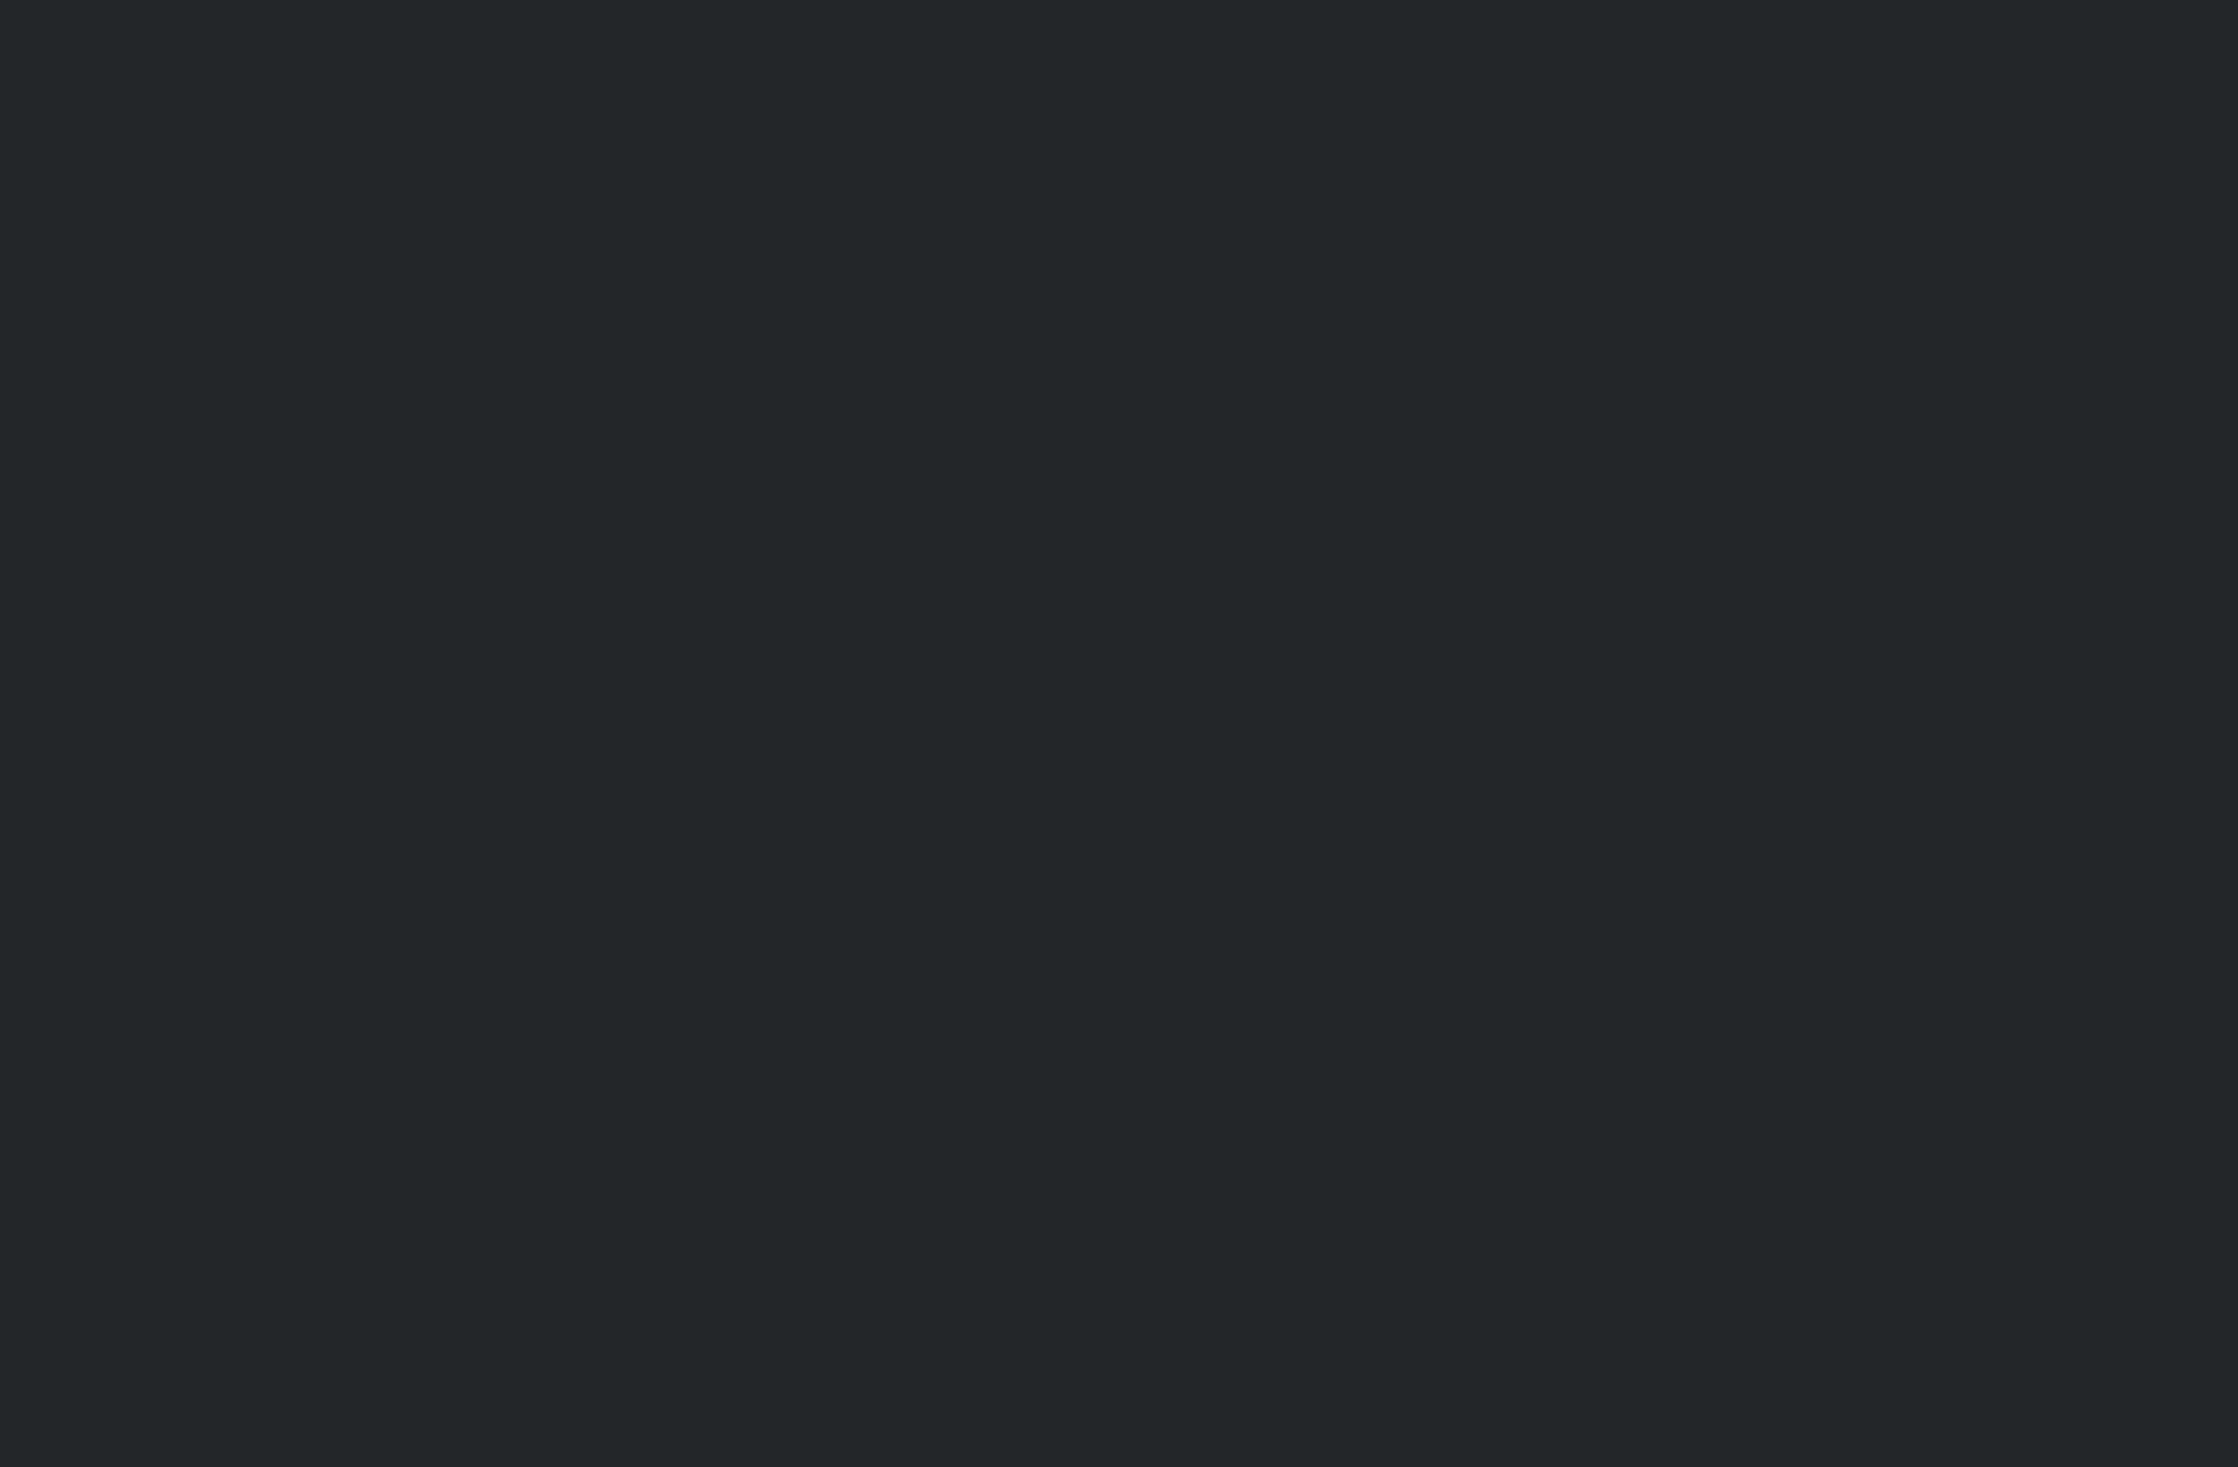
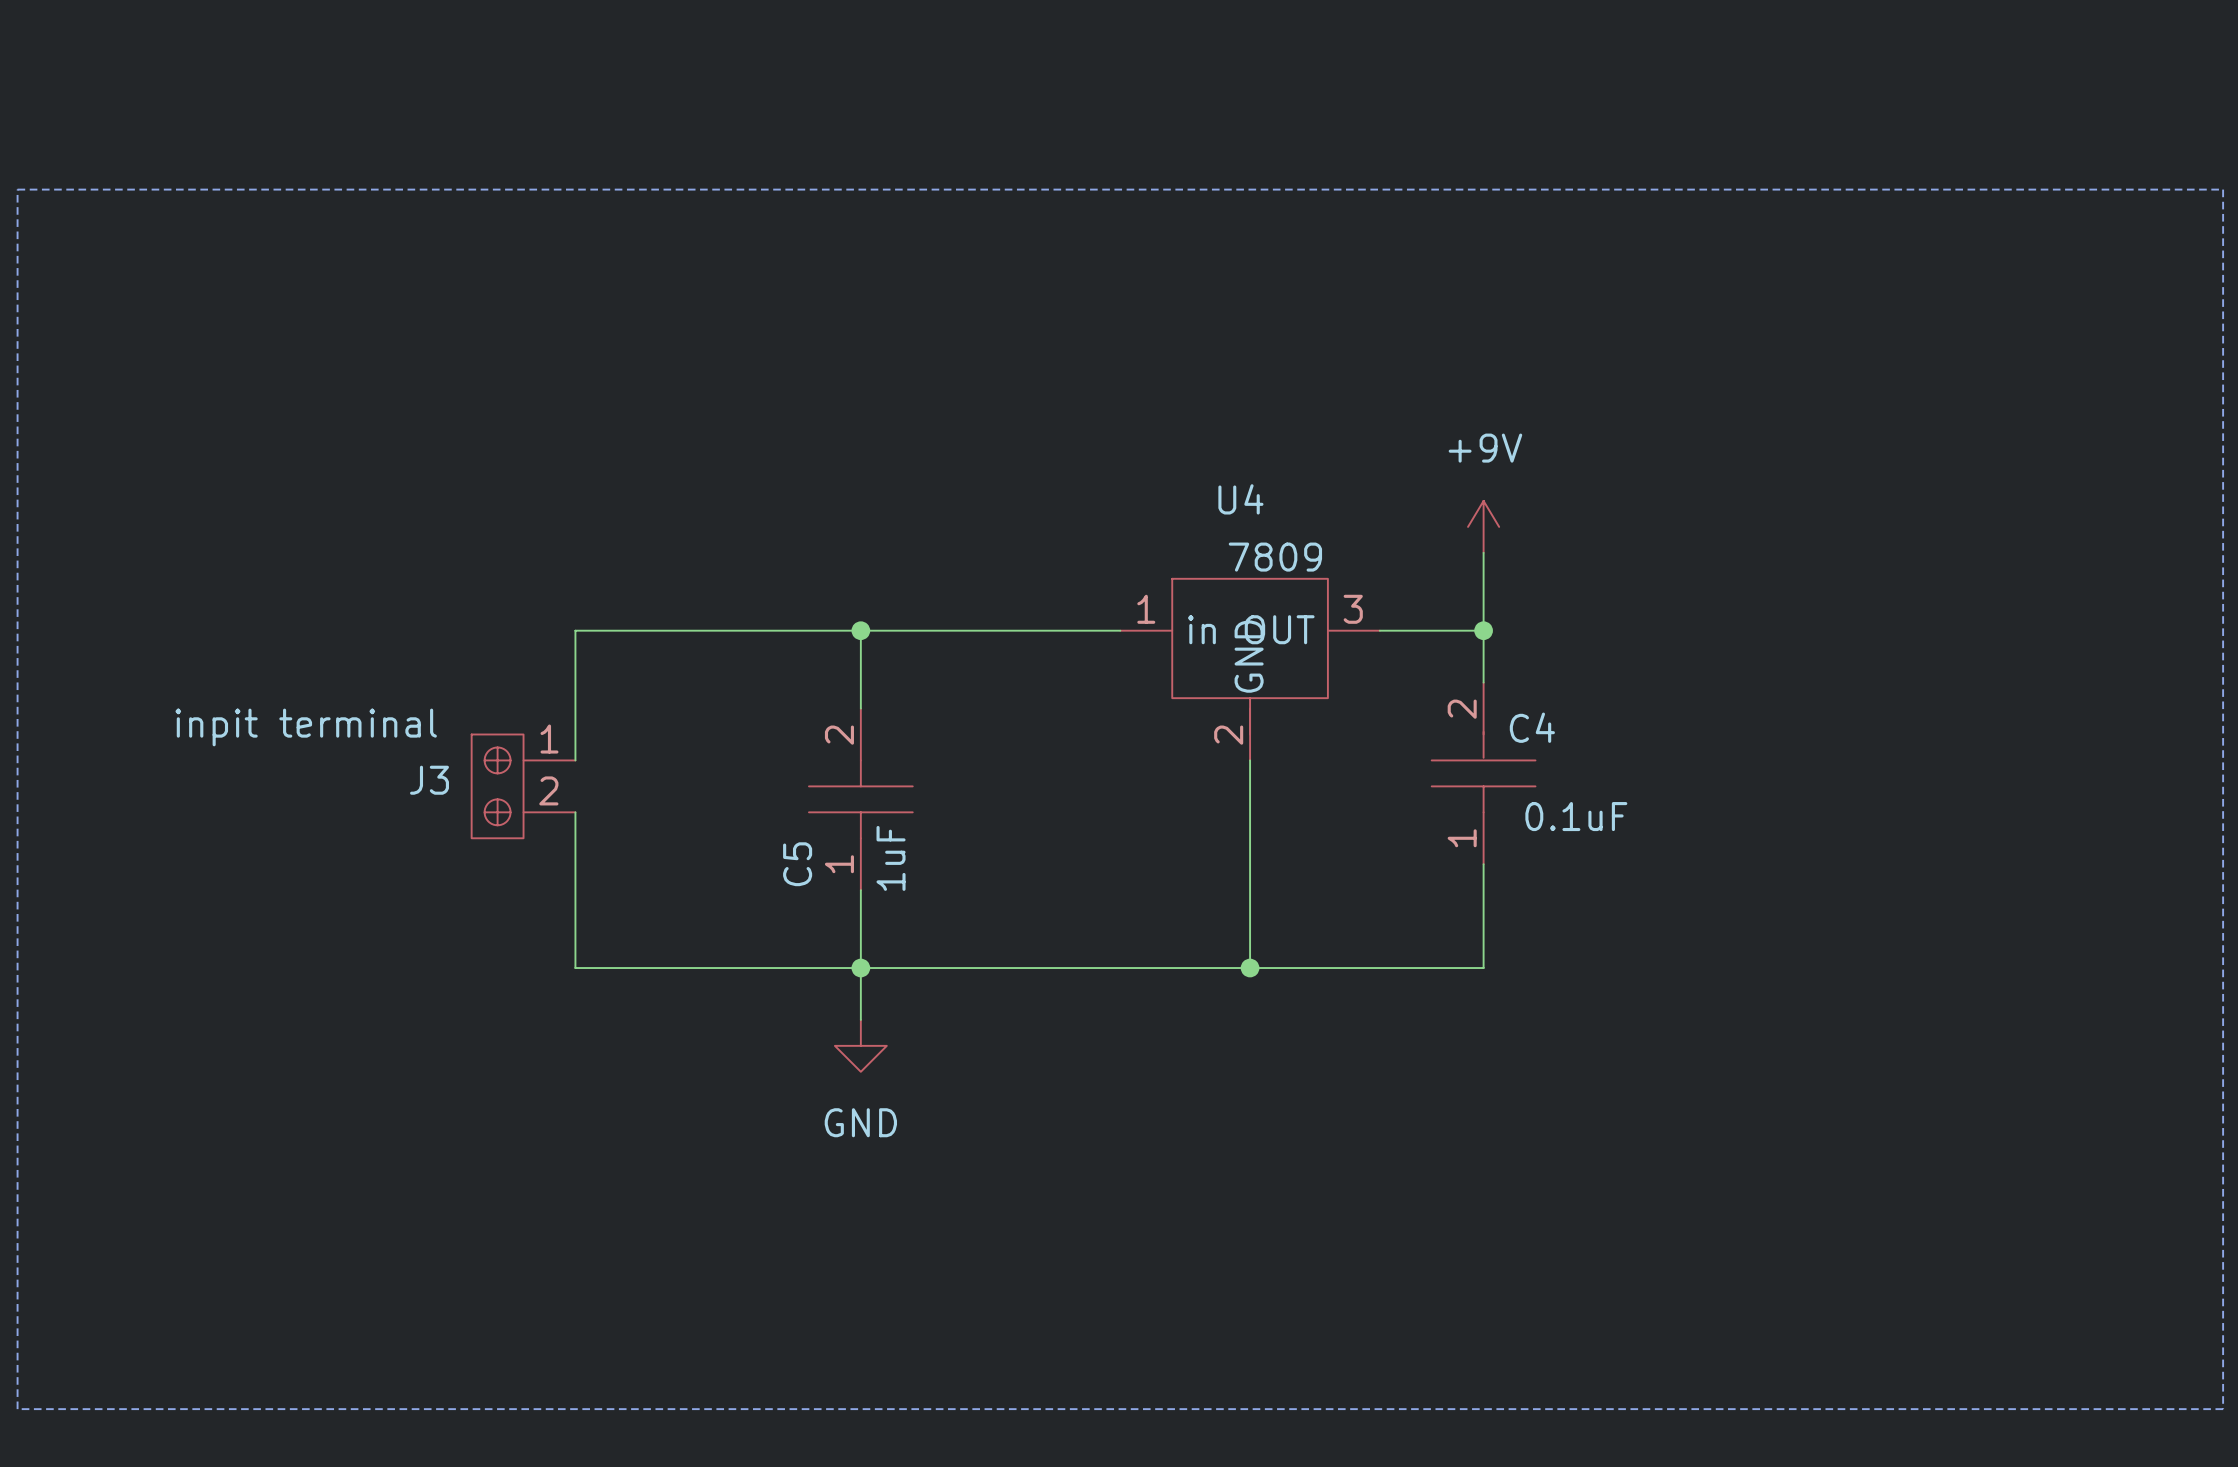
line: none -> (17, 189) (2223, 189) (2223, 1409) (17, 1409) (17, 189)
power symbol: none -> +9V (1483, 526)
wire: none -> (1483, 552) (1483, 682)
wire: none -> (860, 630) (860, 708)
junction: none -> (860, 630)
wire: none -> (1120, 630) (575, 630) (575, 760)
wire: none -> (1379, 630) (1483, 630)
junction: none -> (1483, 630)
U4: none -> 7809 (1250, 669)
wire: none -> (1250, 760) (1250, 968)
C4: none -> 0.1uF (1483, 773)
J3: none -> inpit terminal (523, 786)
C5: none -> 1uF (860, 799)
wire: none -> (575, 812) (575, 968) (1483, 968) (1483, 864)
wire: none -> (860, 890) (860, 1019)
junction: none -> (860, 968)
junction: none -> (1250, 968)
power symbol: none -> GND (860, 1045)

